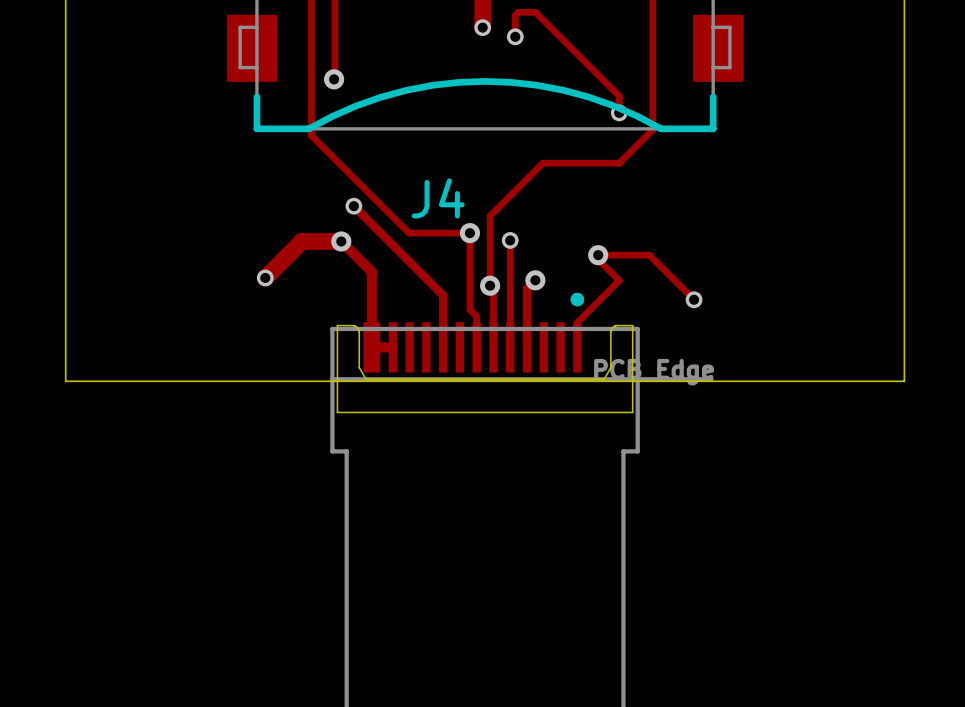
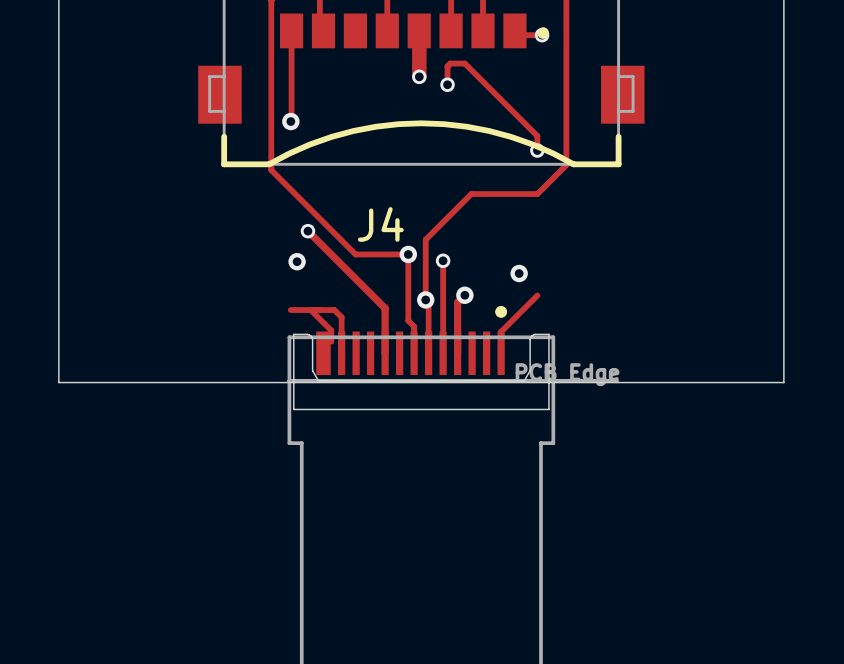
track: (265, 277) (301, 241) (341, 241) (371, 272) (371, 347) (392, 347) -> (290, 310) (334, 310) (341, 317) (341, 353)
via: (265, 277) -> none
track: (619, 280) (598, 259) (598, 255) (649, 255) (694, 299) -> none
track: none -> (310, 310) (331, 330) (331, 341)
via: (694, 299) -> none

